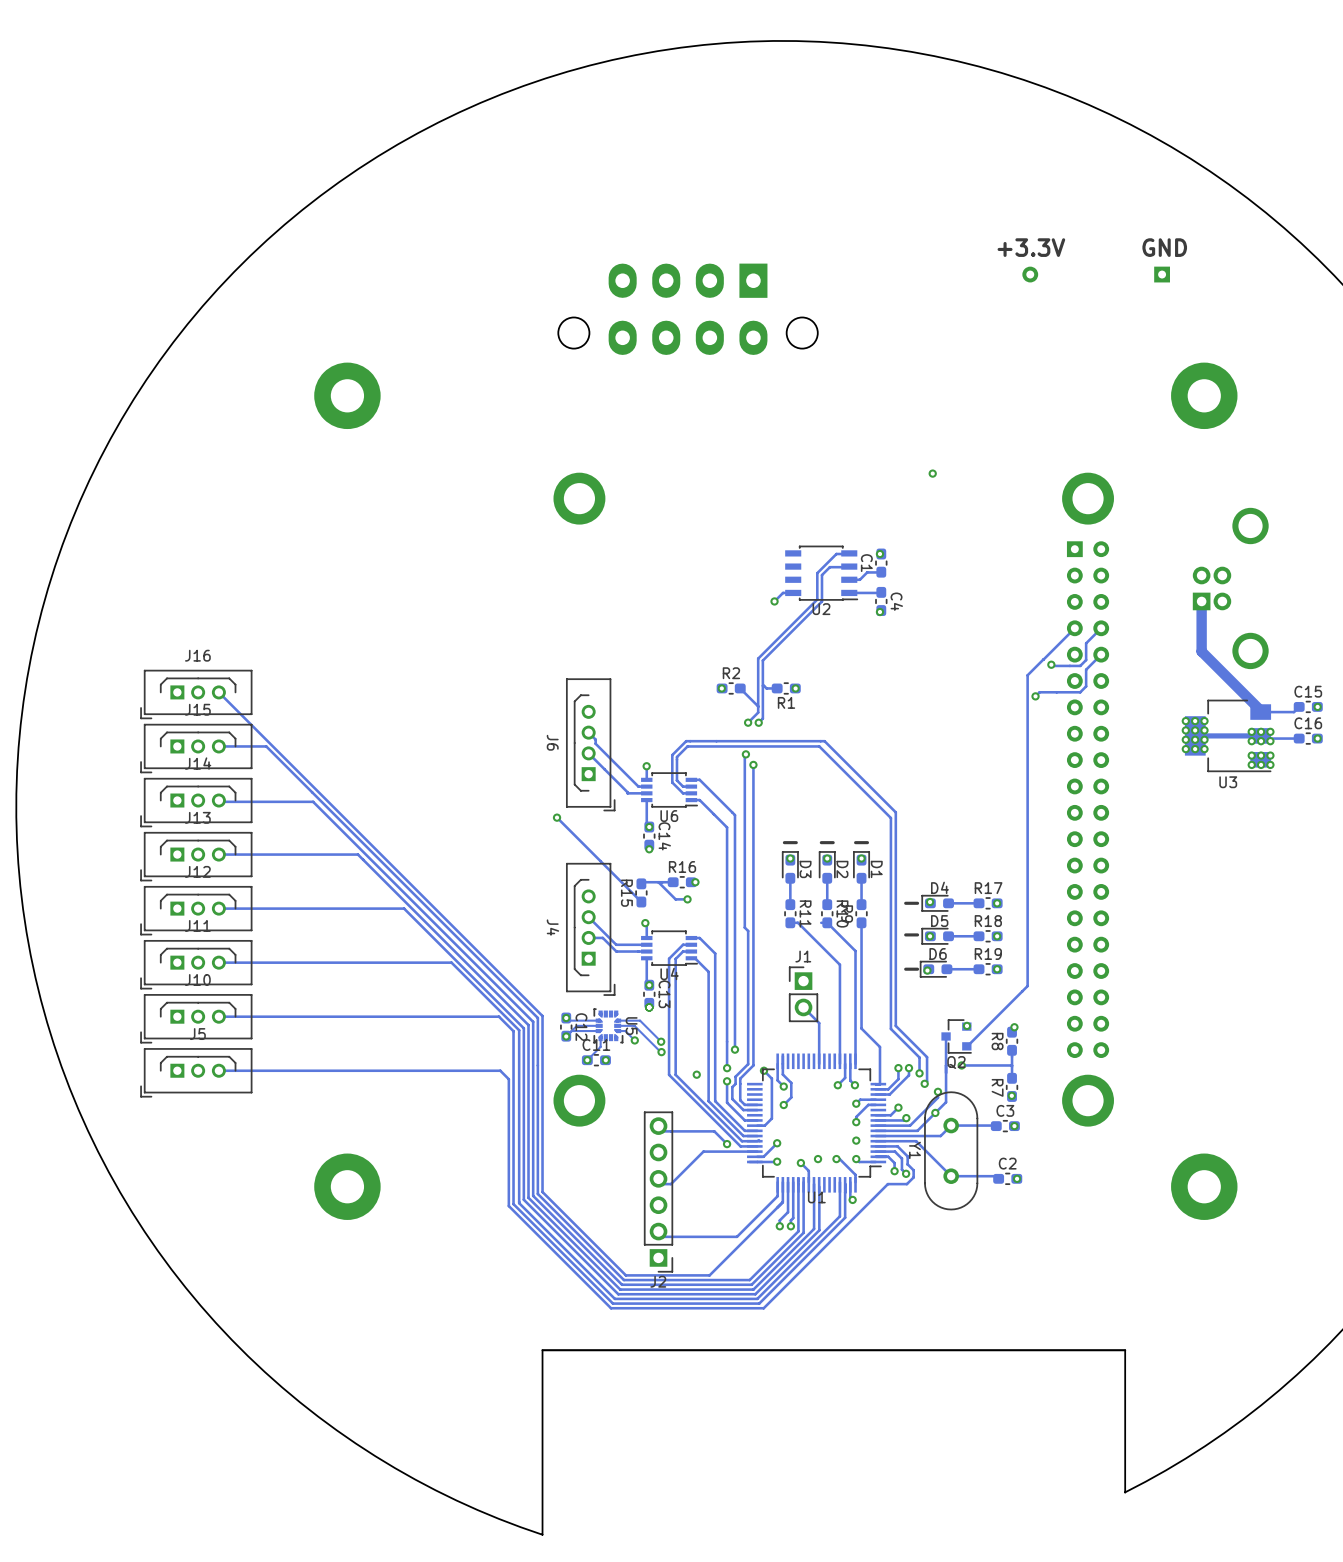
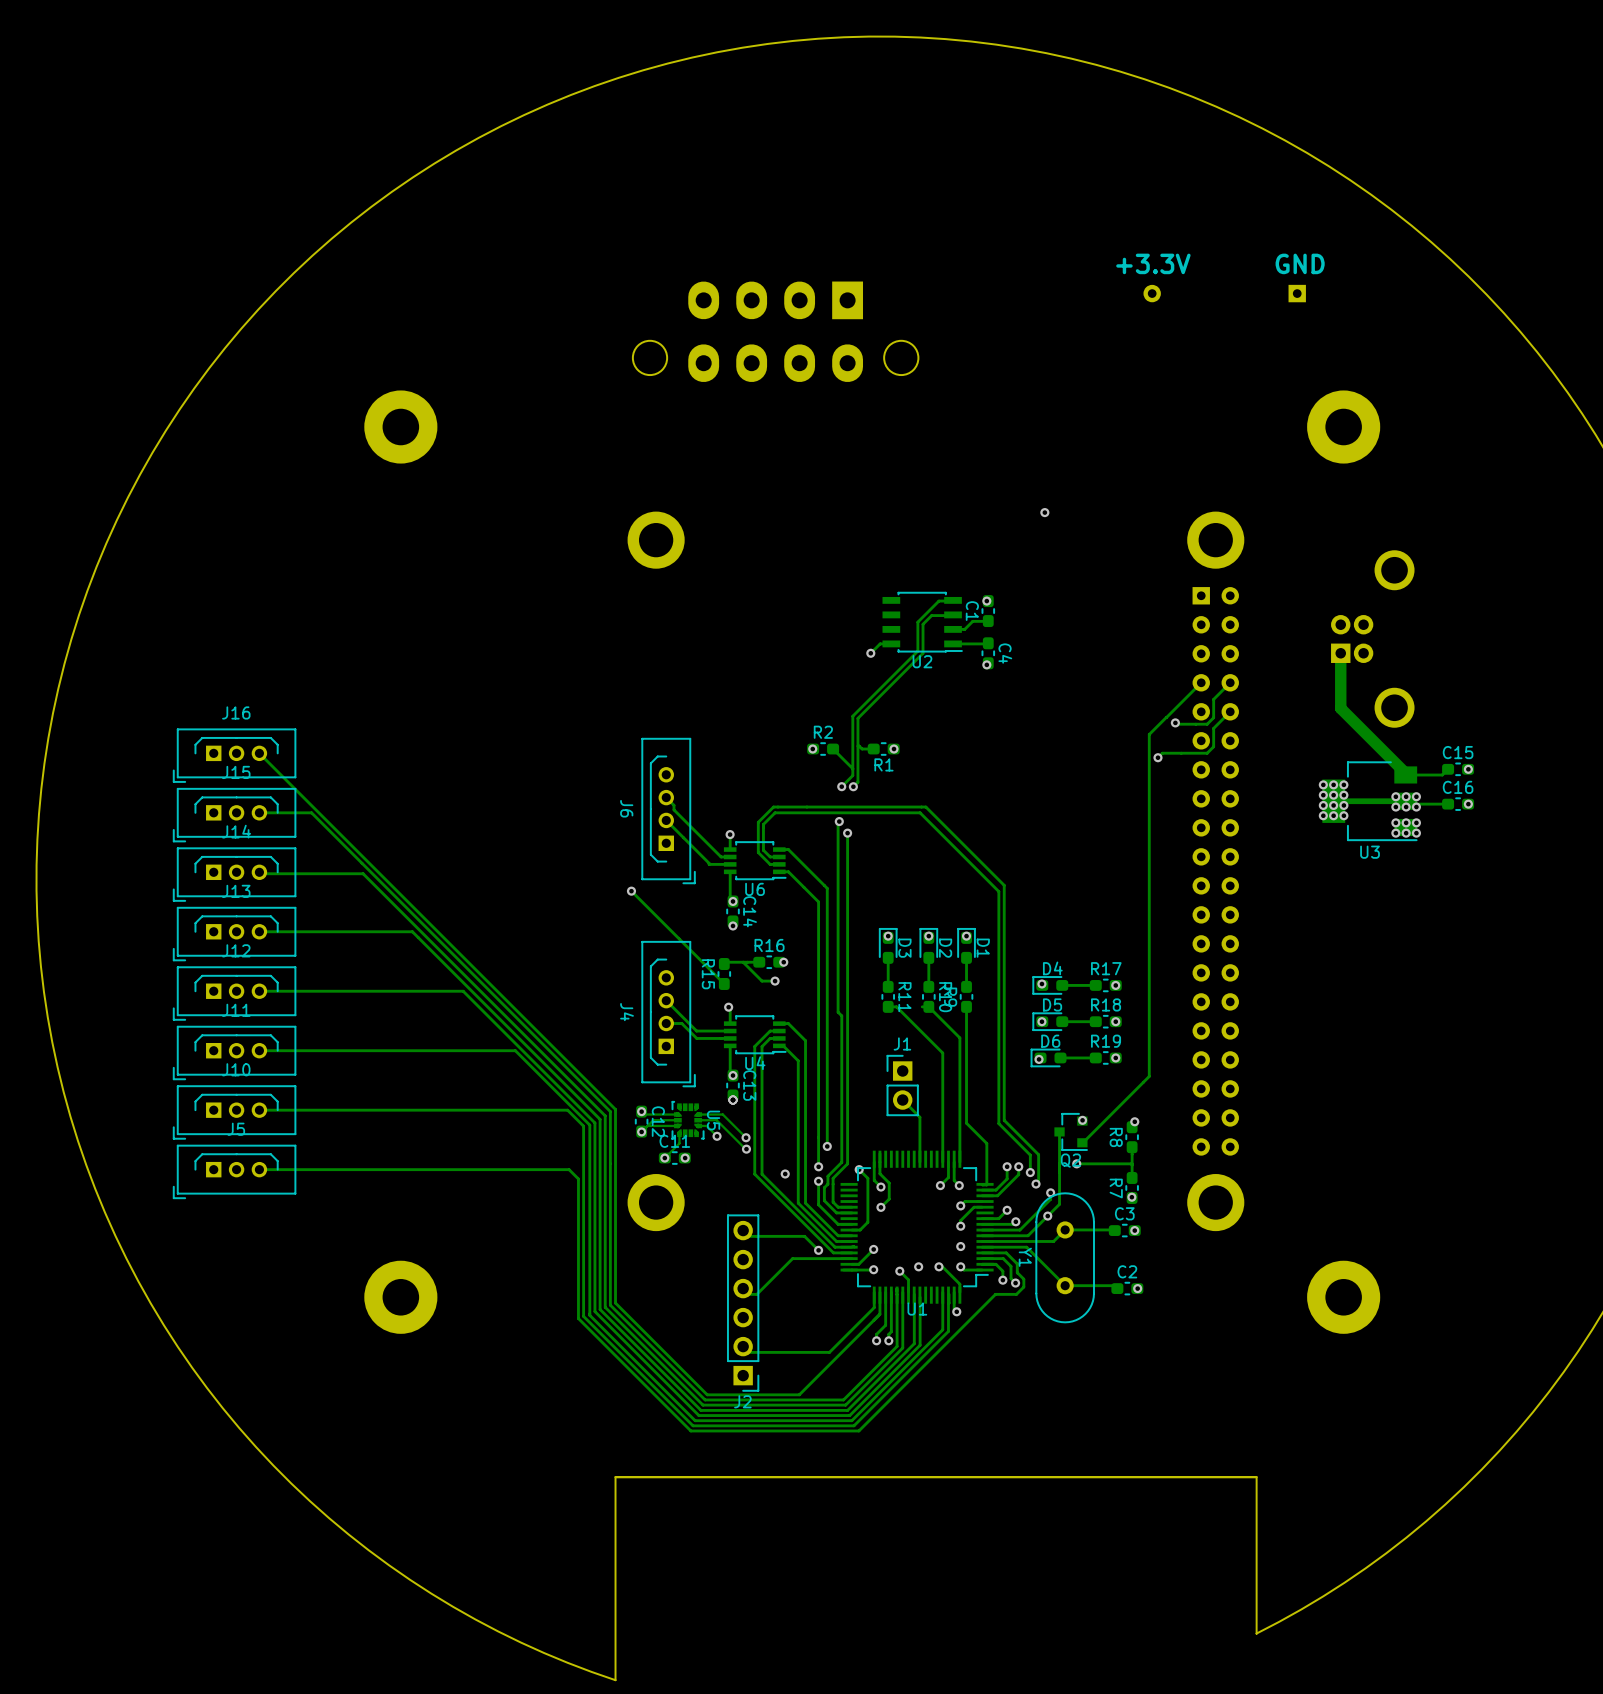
text: - (790, 842) -> none
text: - (827, 842) -> none
text: - (861, 842) -> none
text: - (911, 903) -> none
text: - (911, 934) -> none
text: - (911, 969) -> none

